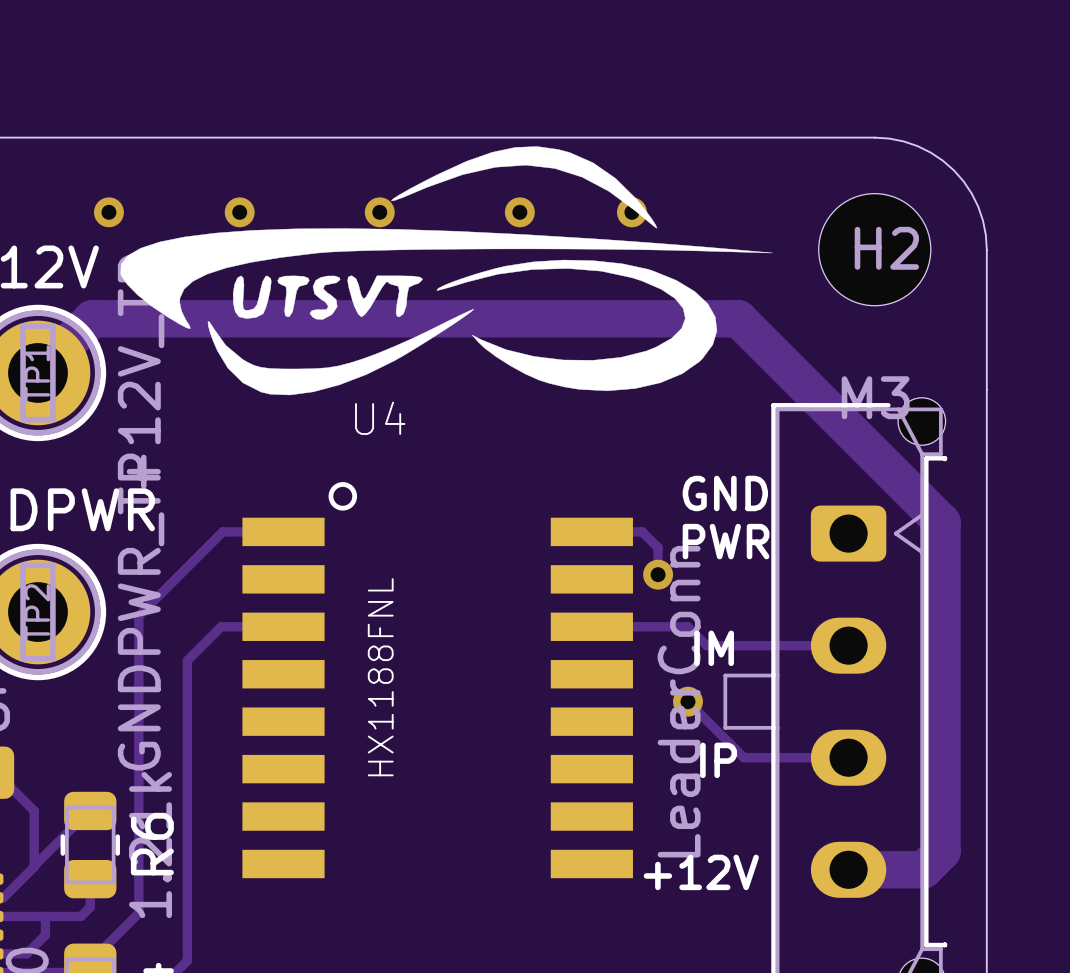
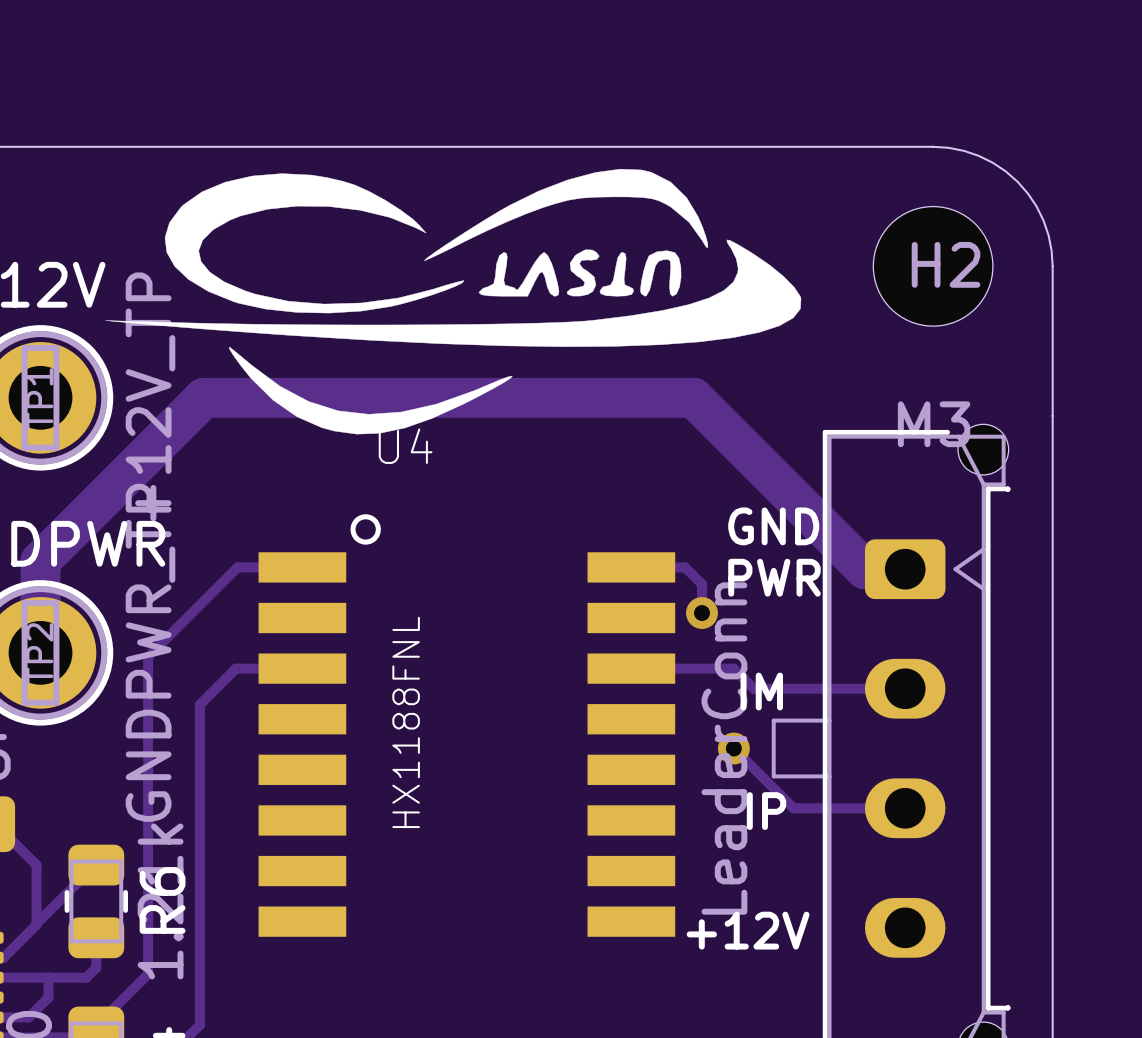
drawing shape: [120, 146, 773, 396] -> [105, 168, 802, 435]
via: (108, 212) -> none
via: (239, 212) -> none
via: (379, 212) -> none
via: (519, 212) -> none
via: (631, 212) -> none
track: (37, 372) (92, 318) (738, 318) (941, 522) (941, 851) (923, 869) (848, 869) -> none
track: none -> (905, 569) (864, 569) (693, 397) (203, 397) (40, 561) (40, 652)

